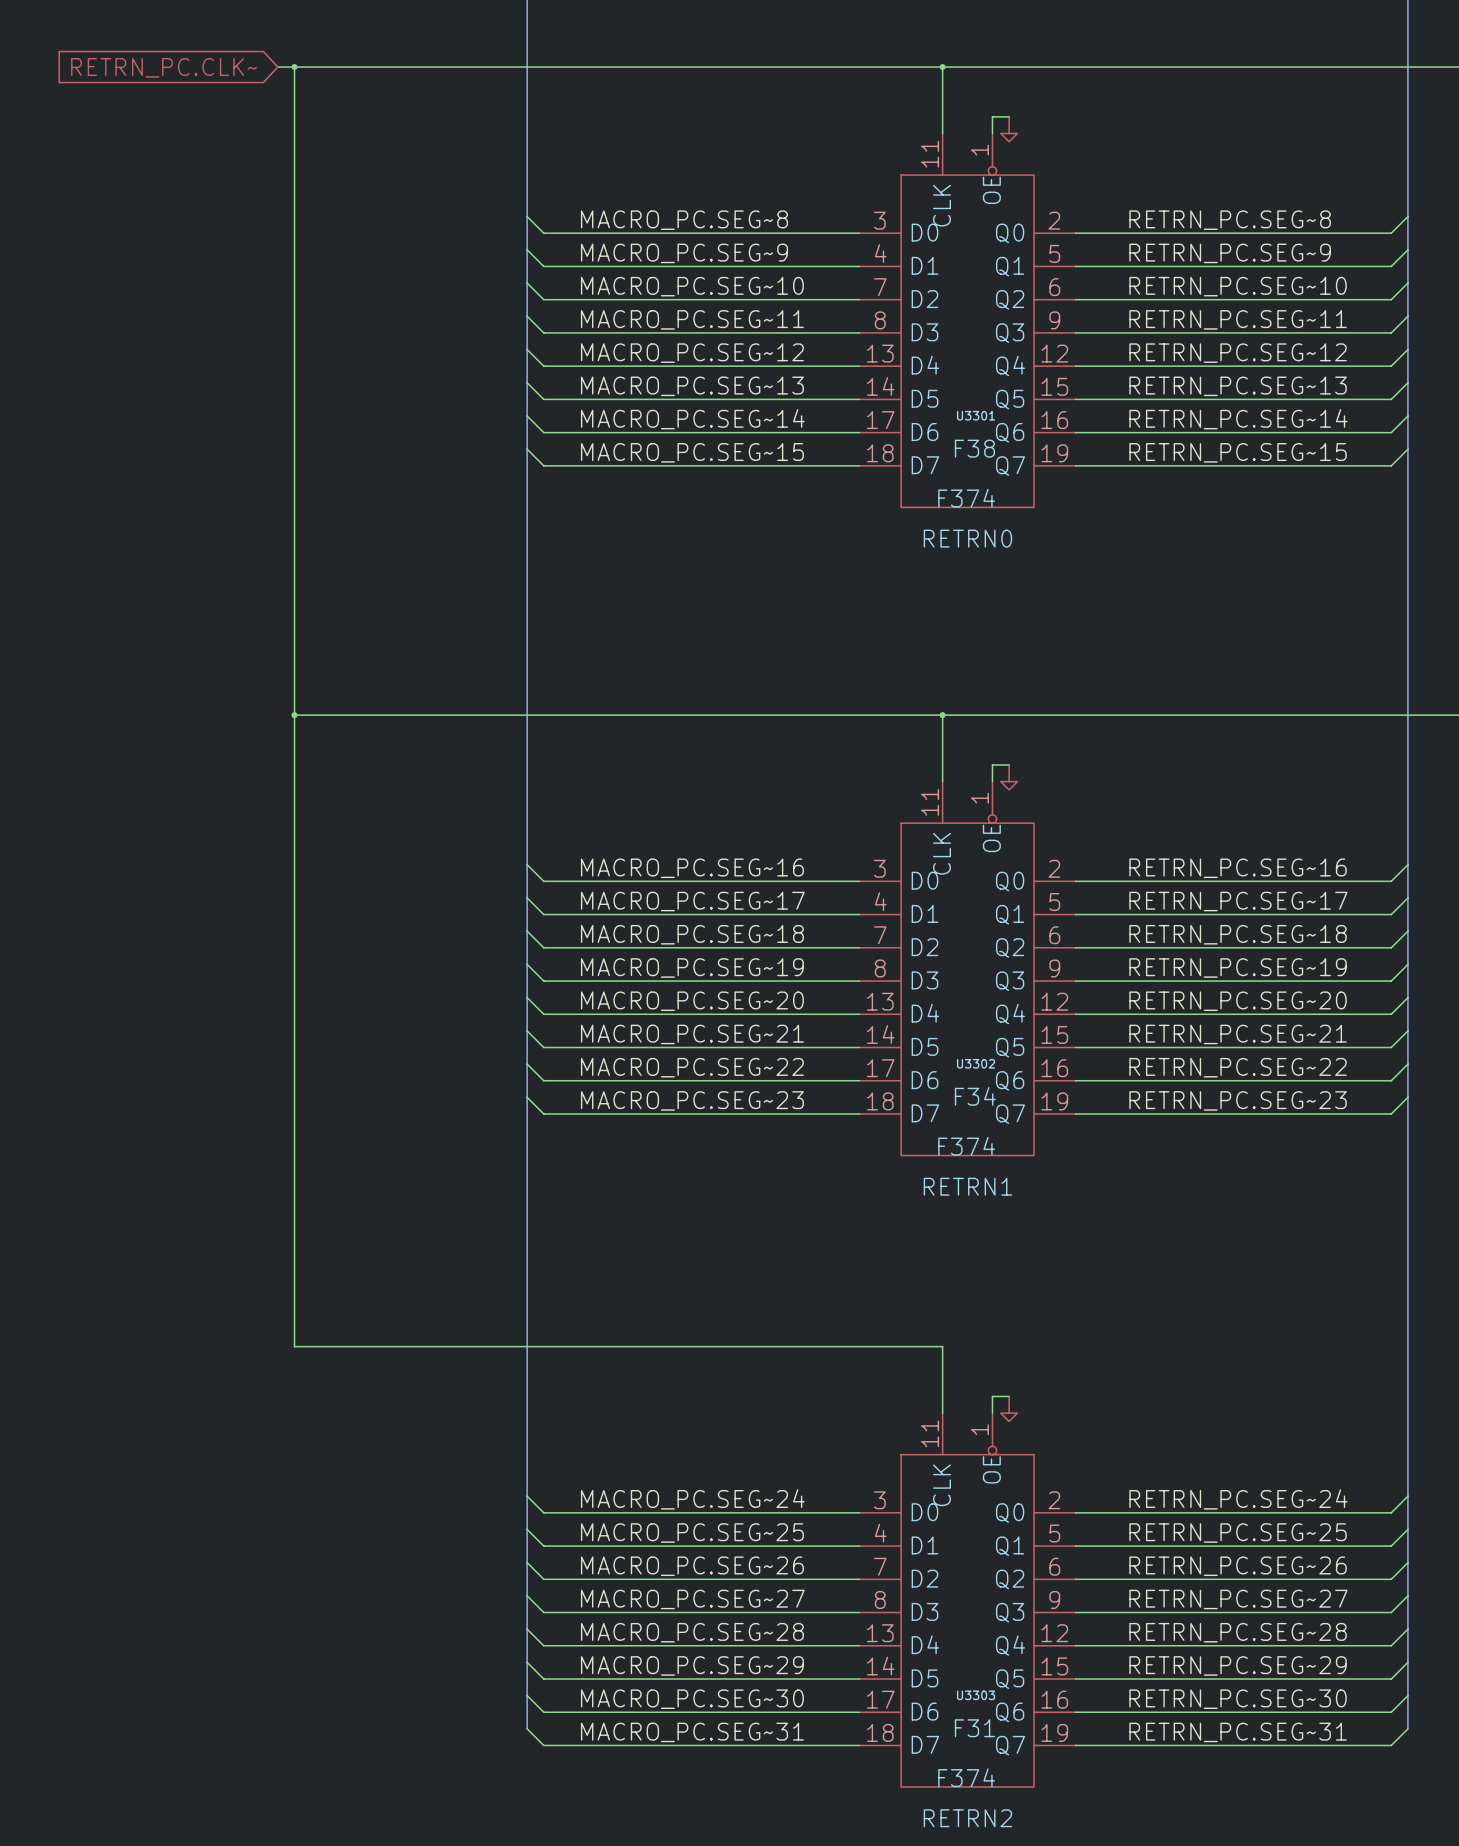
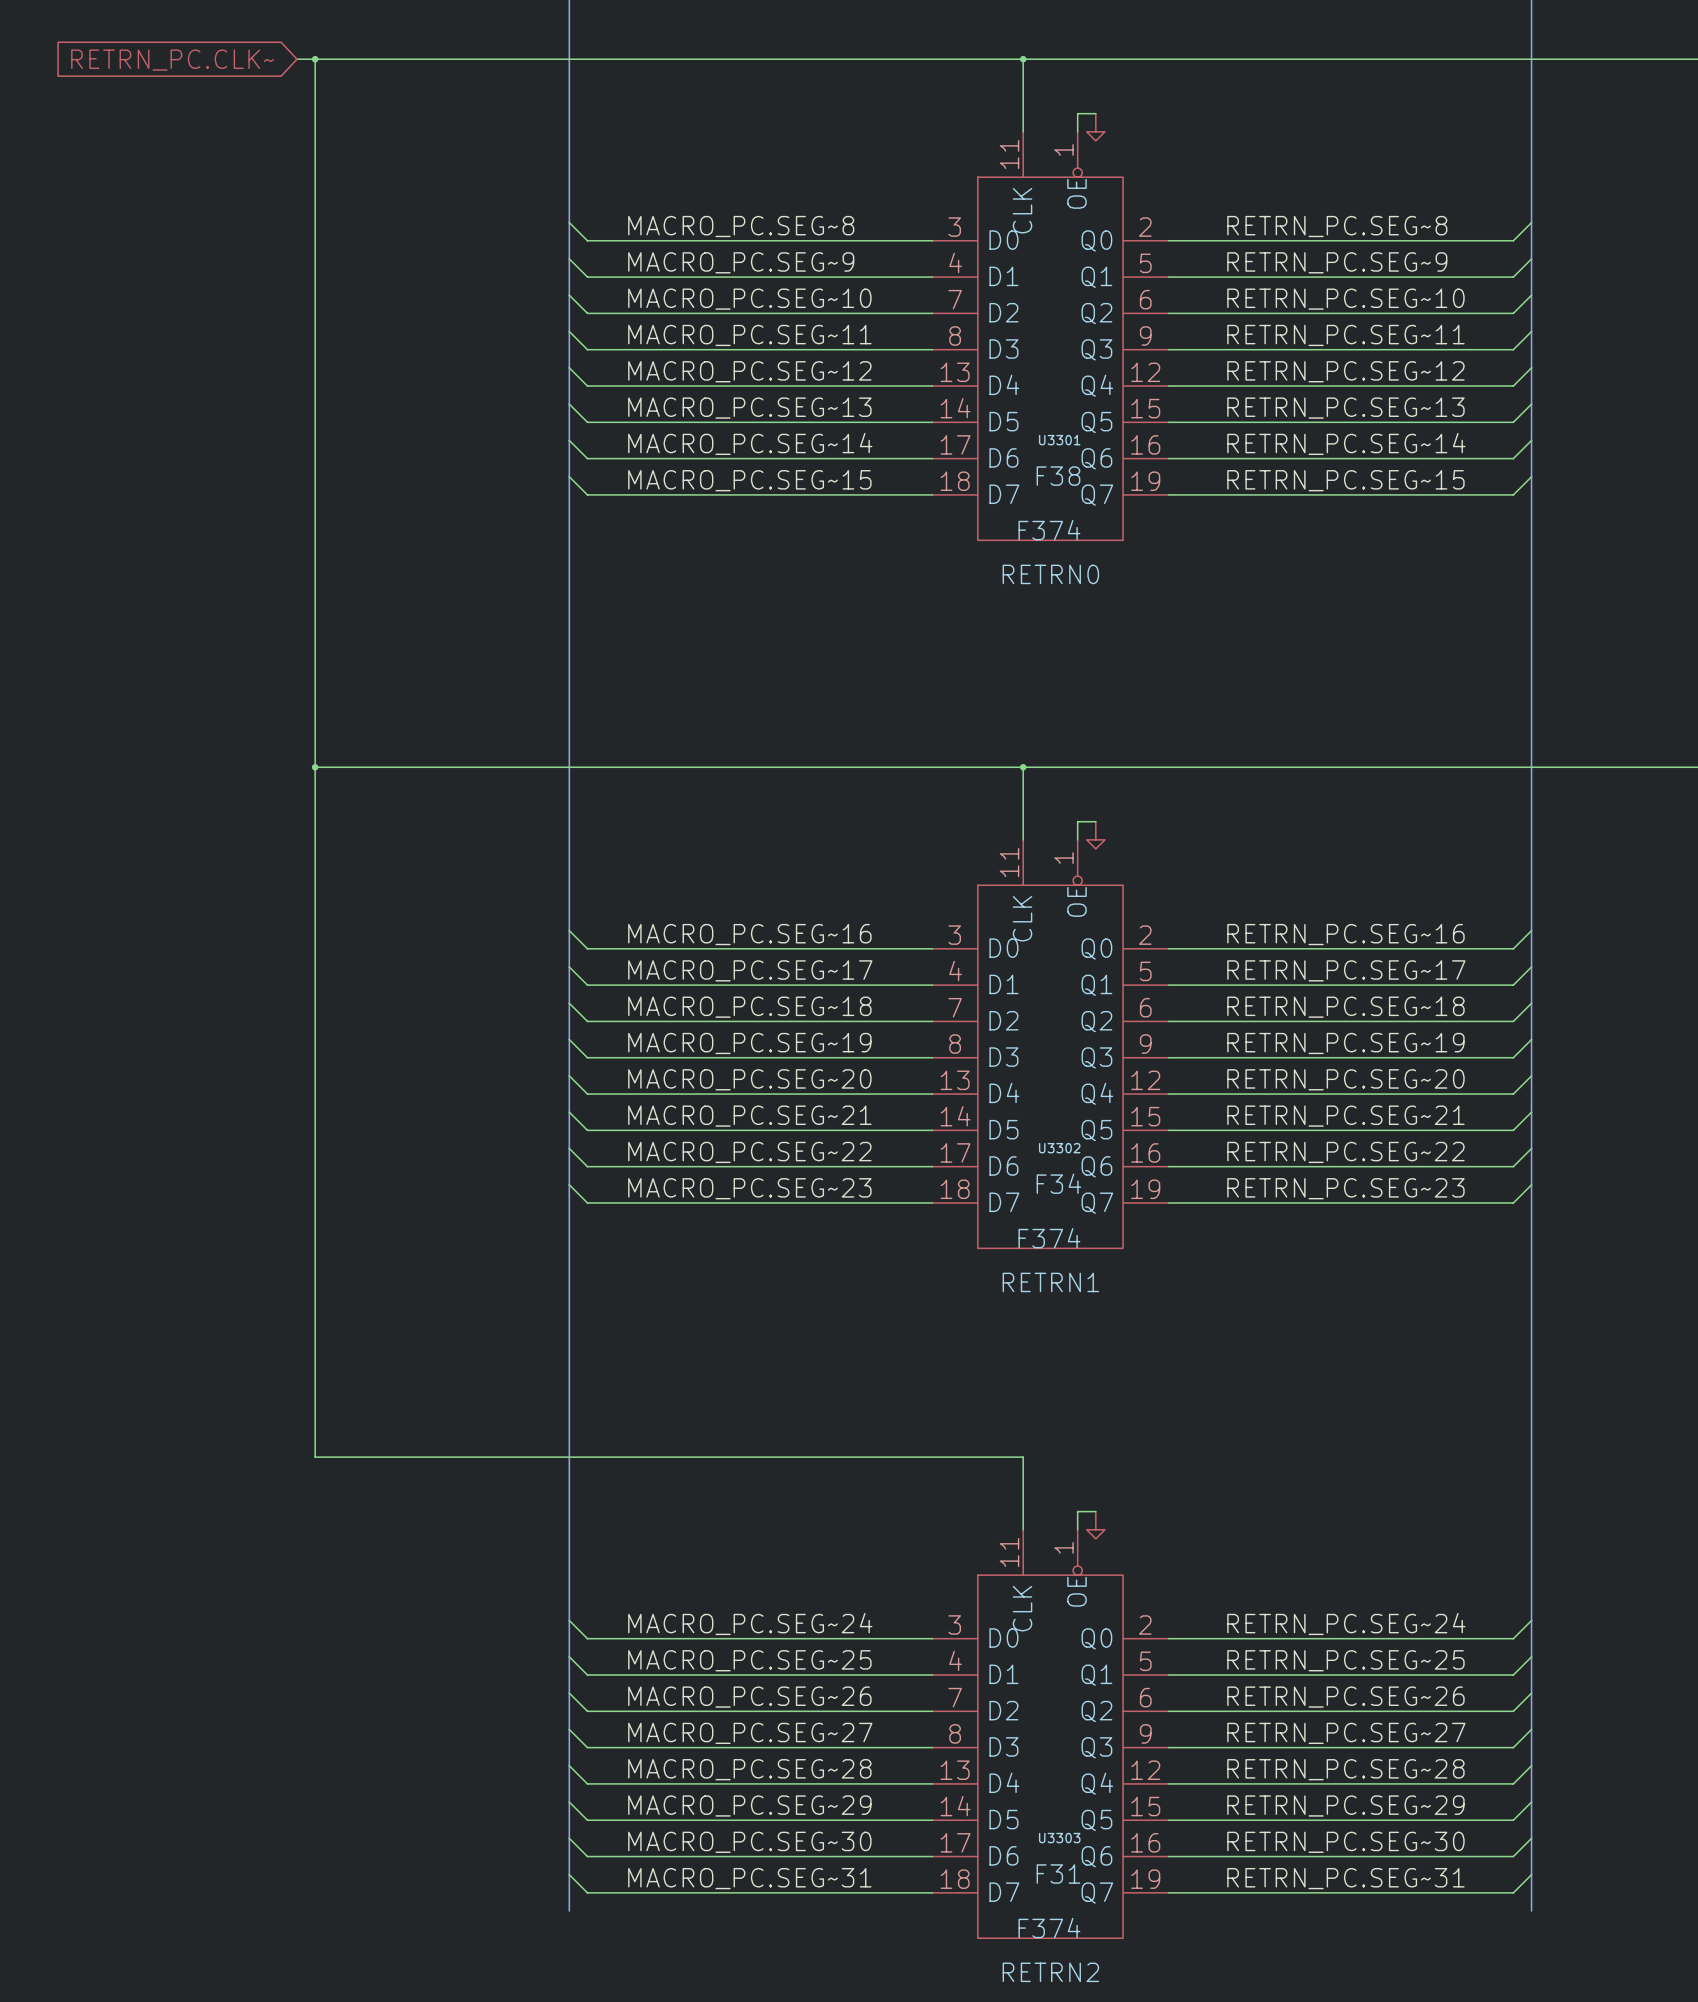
bus: none -> (569, 1874) (569, 1911)
bus: none -> (1531, 1874) (1531, 1911)

